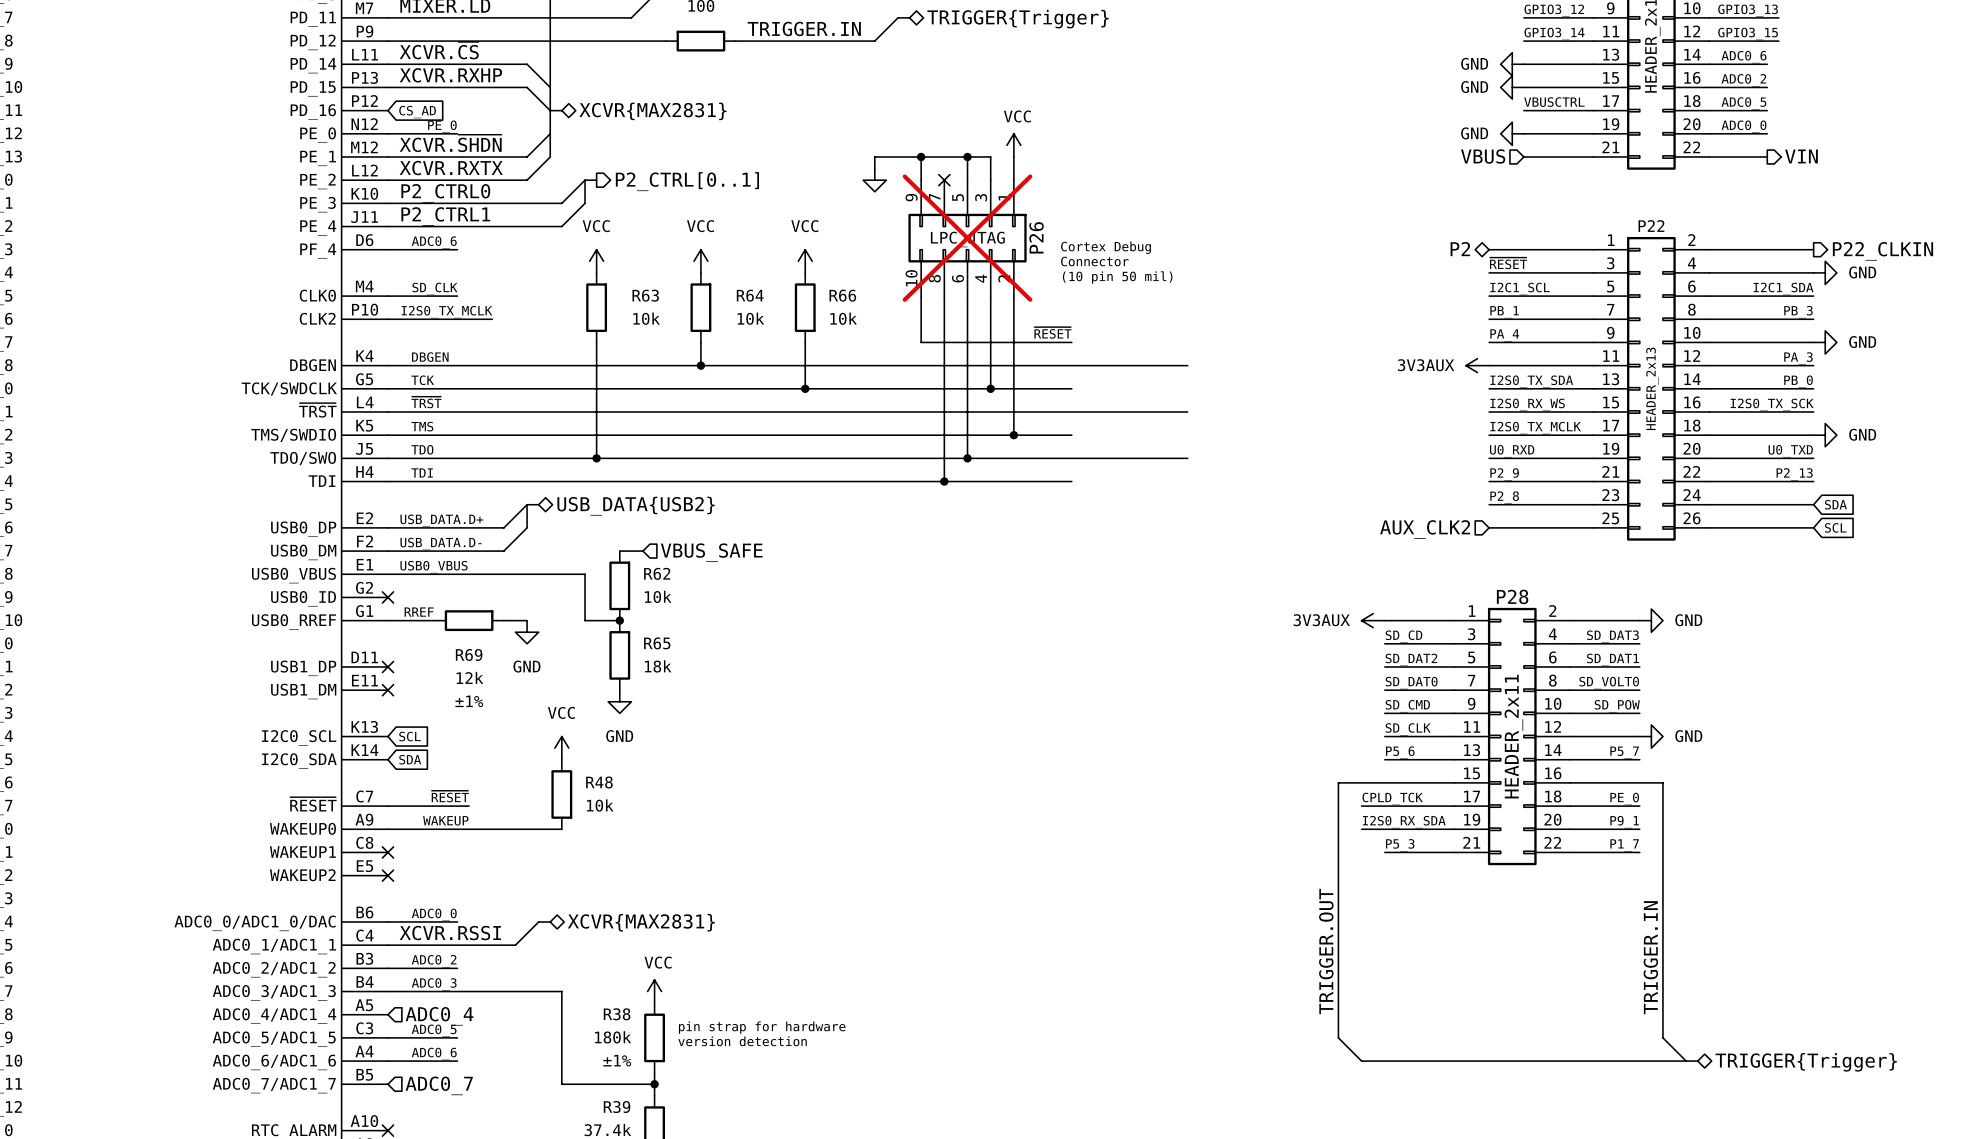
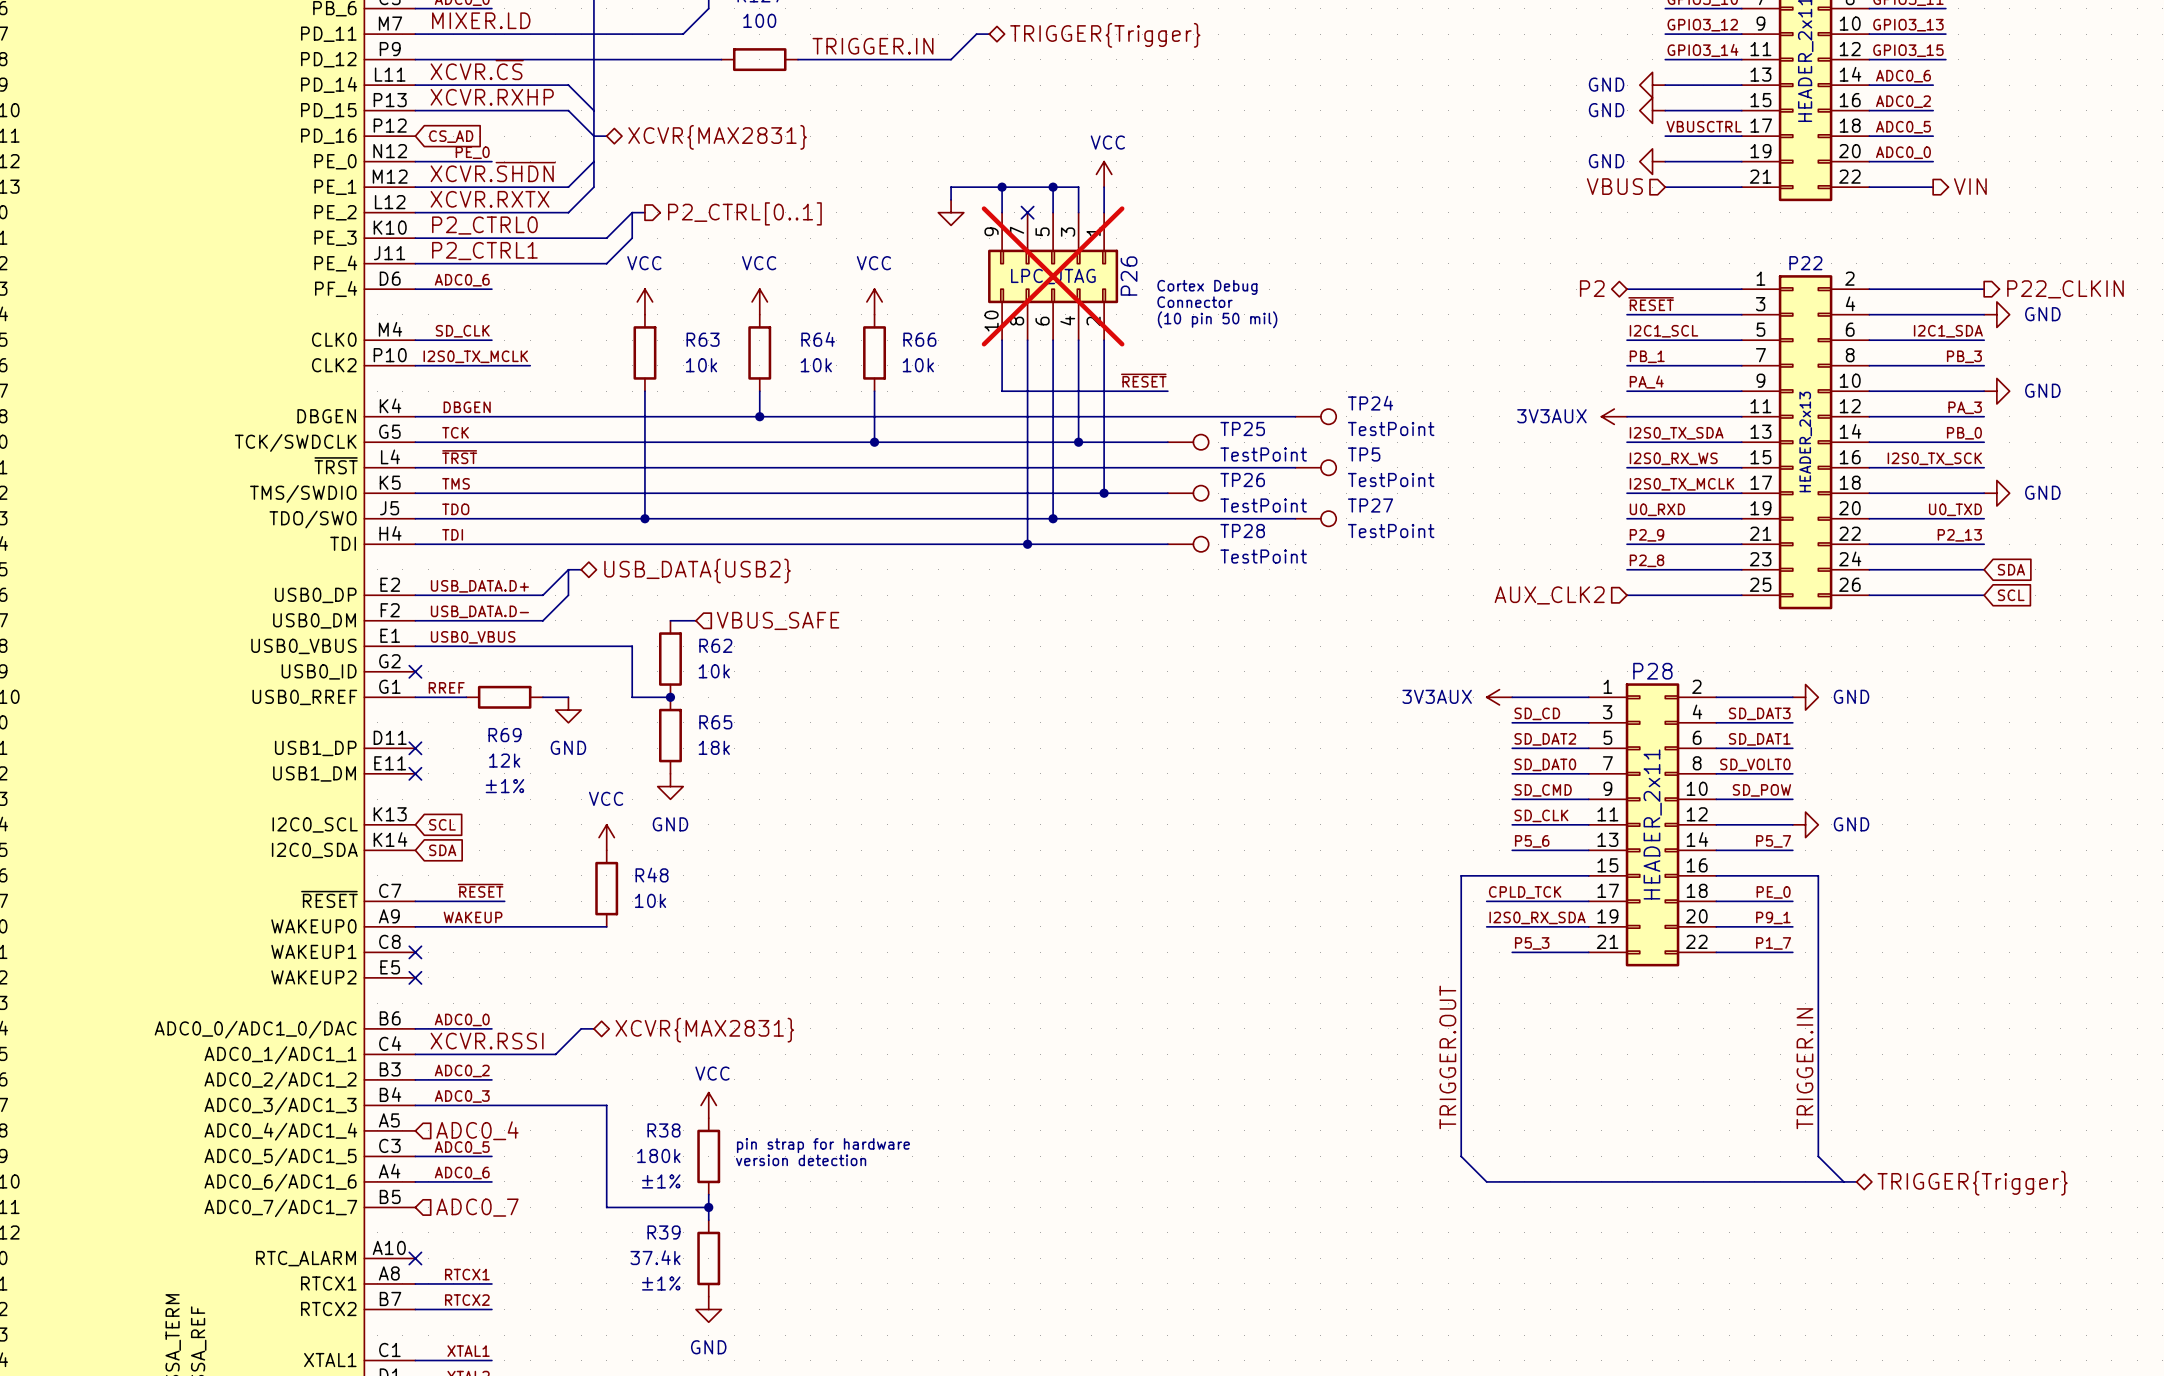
TP24: none -> TestPoint (1315, 416)
TP25: none -> TestPoint (1188, 442)
TP5: none -> TestPoint (1315, 467)
TP26: none -> TestPoint (1188, 493)
TP27: none -> TestPoint (1315, 518)
TP28: none -> TestPoint (1188, 544)

